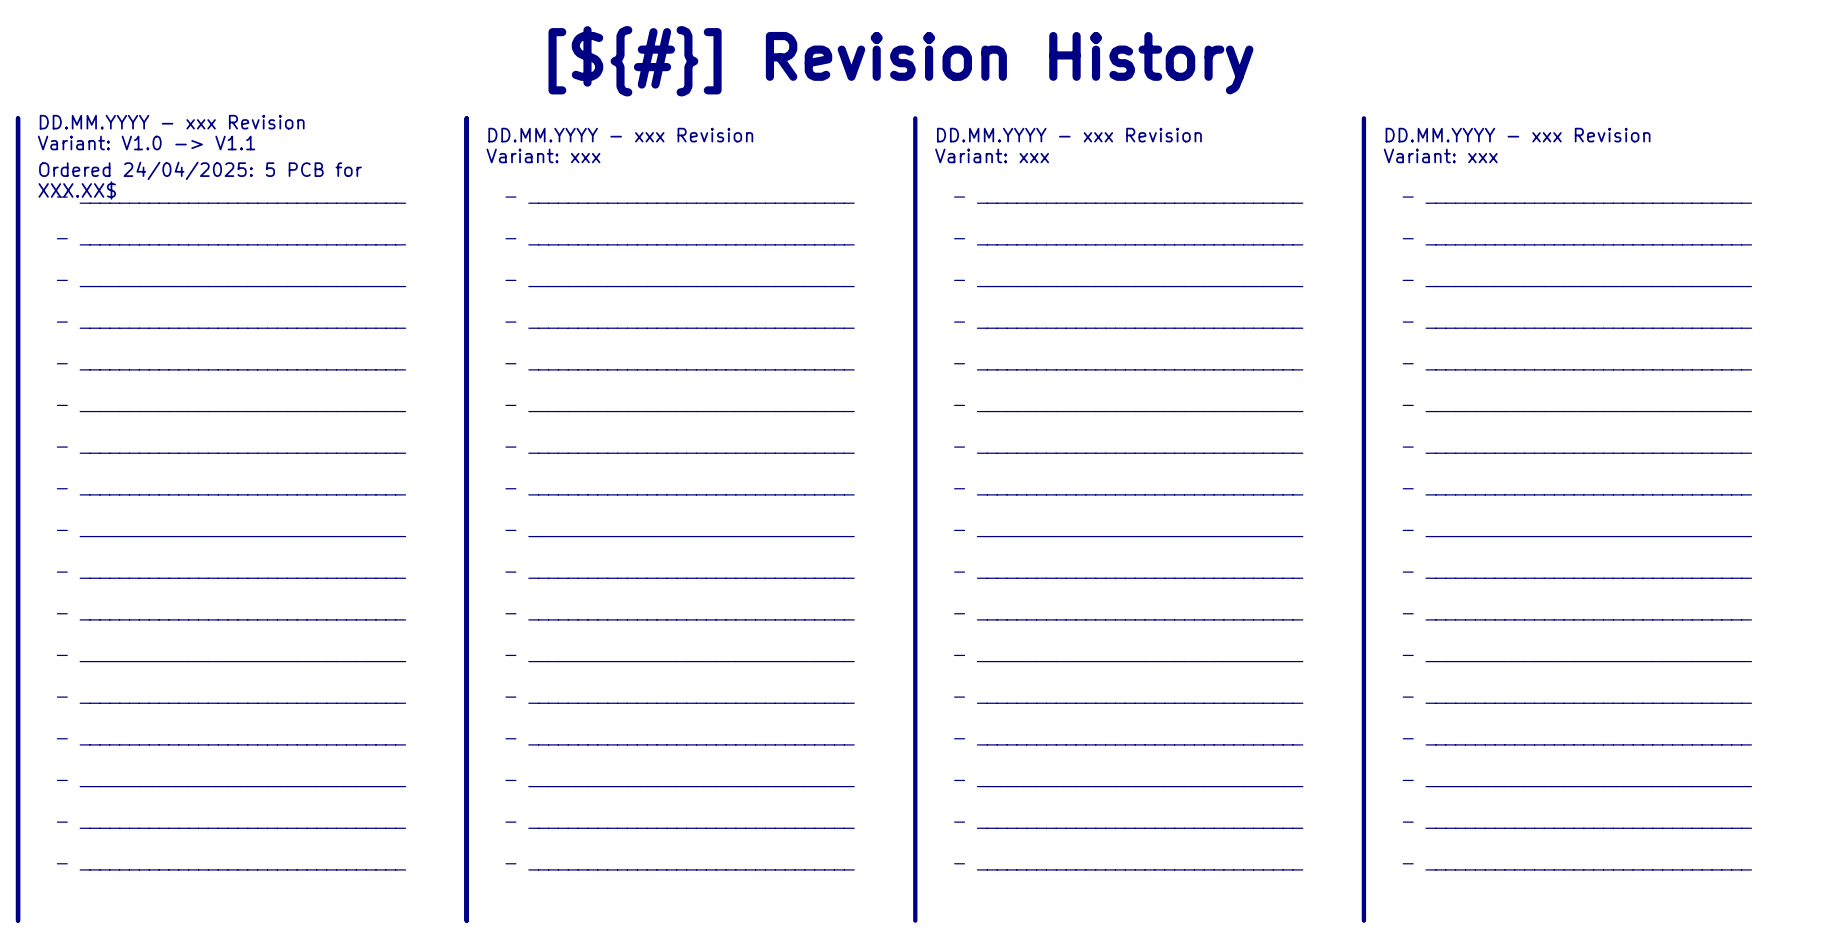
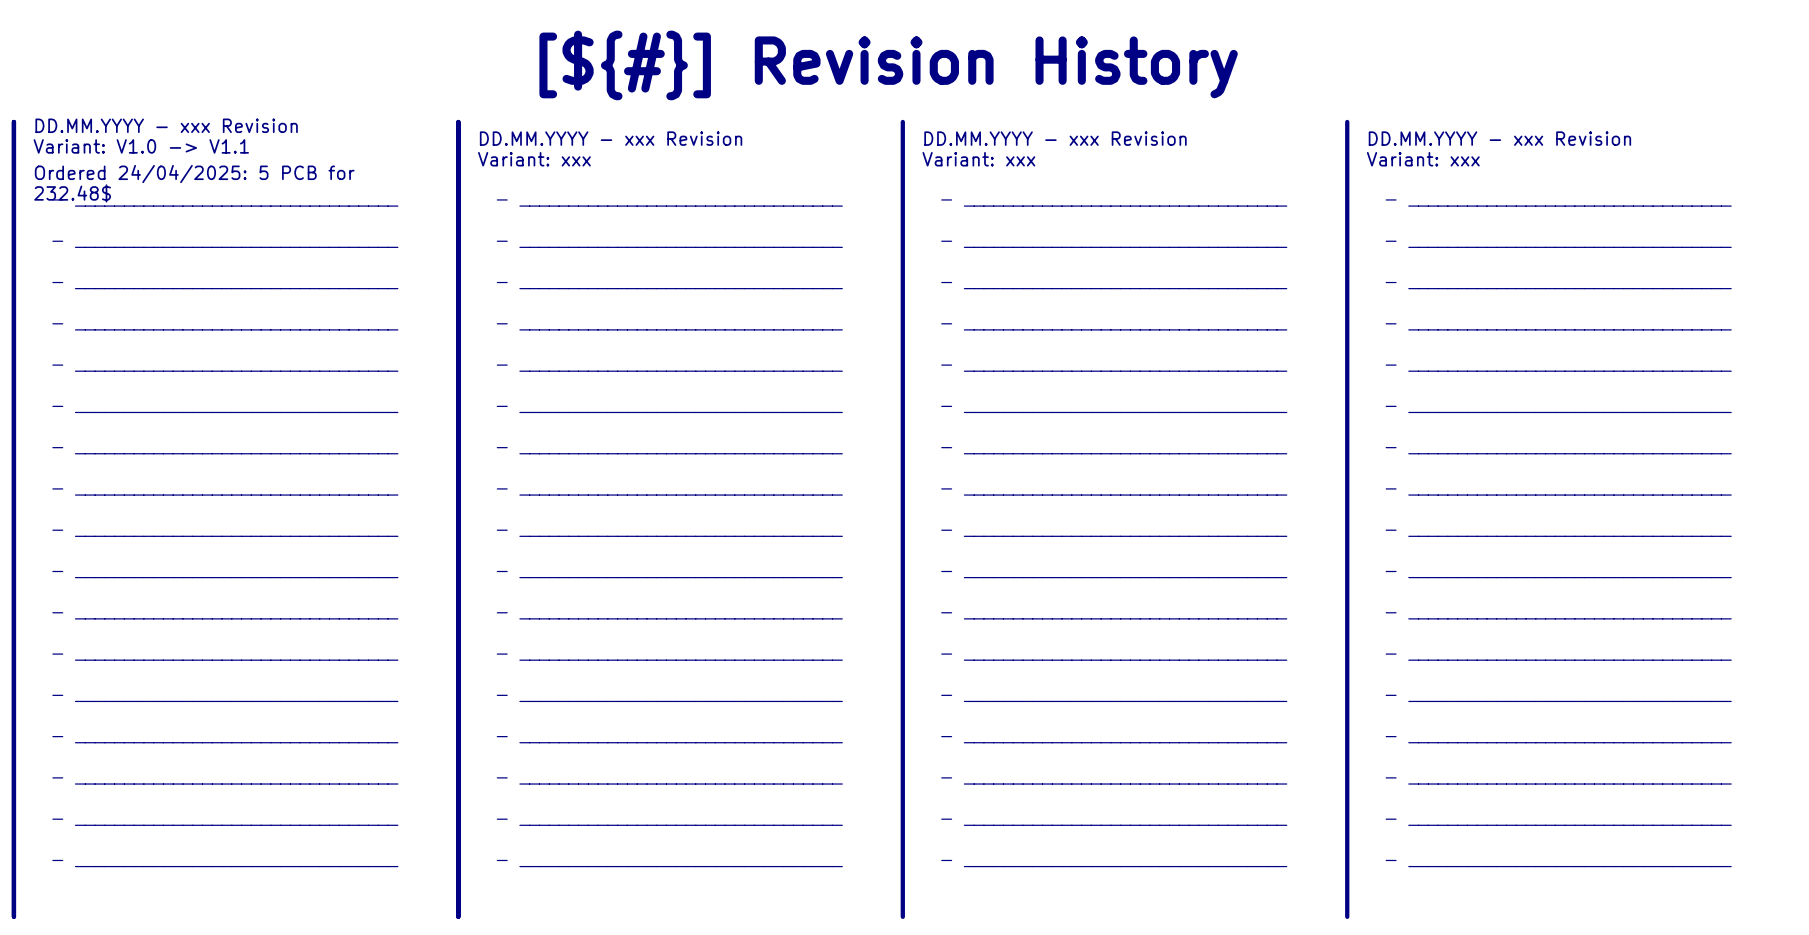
text: XXX.XX$ (77, 190) -> 232.48$ (72, 193)

